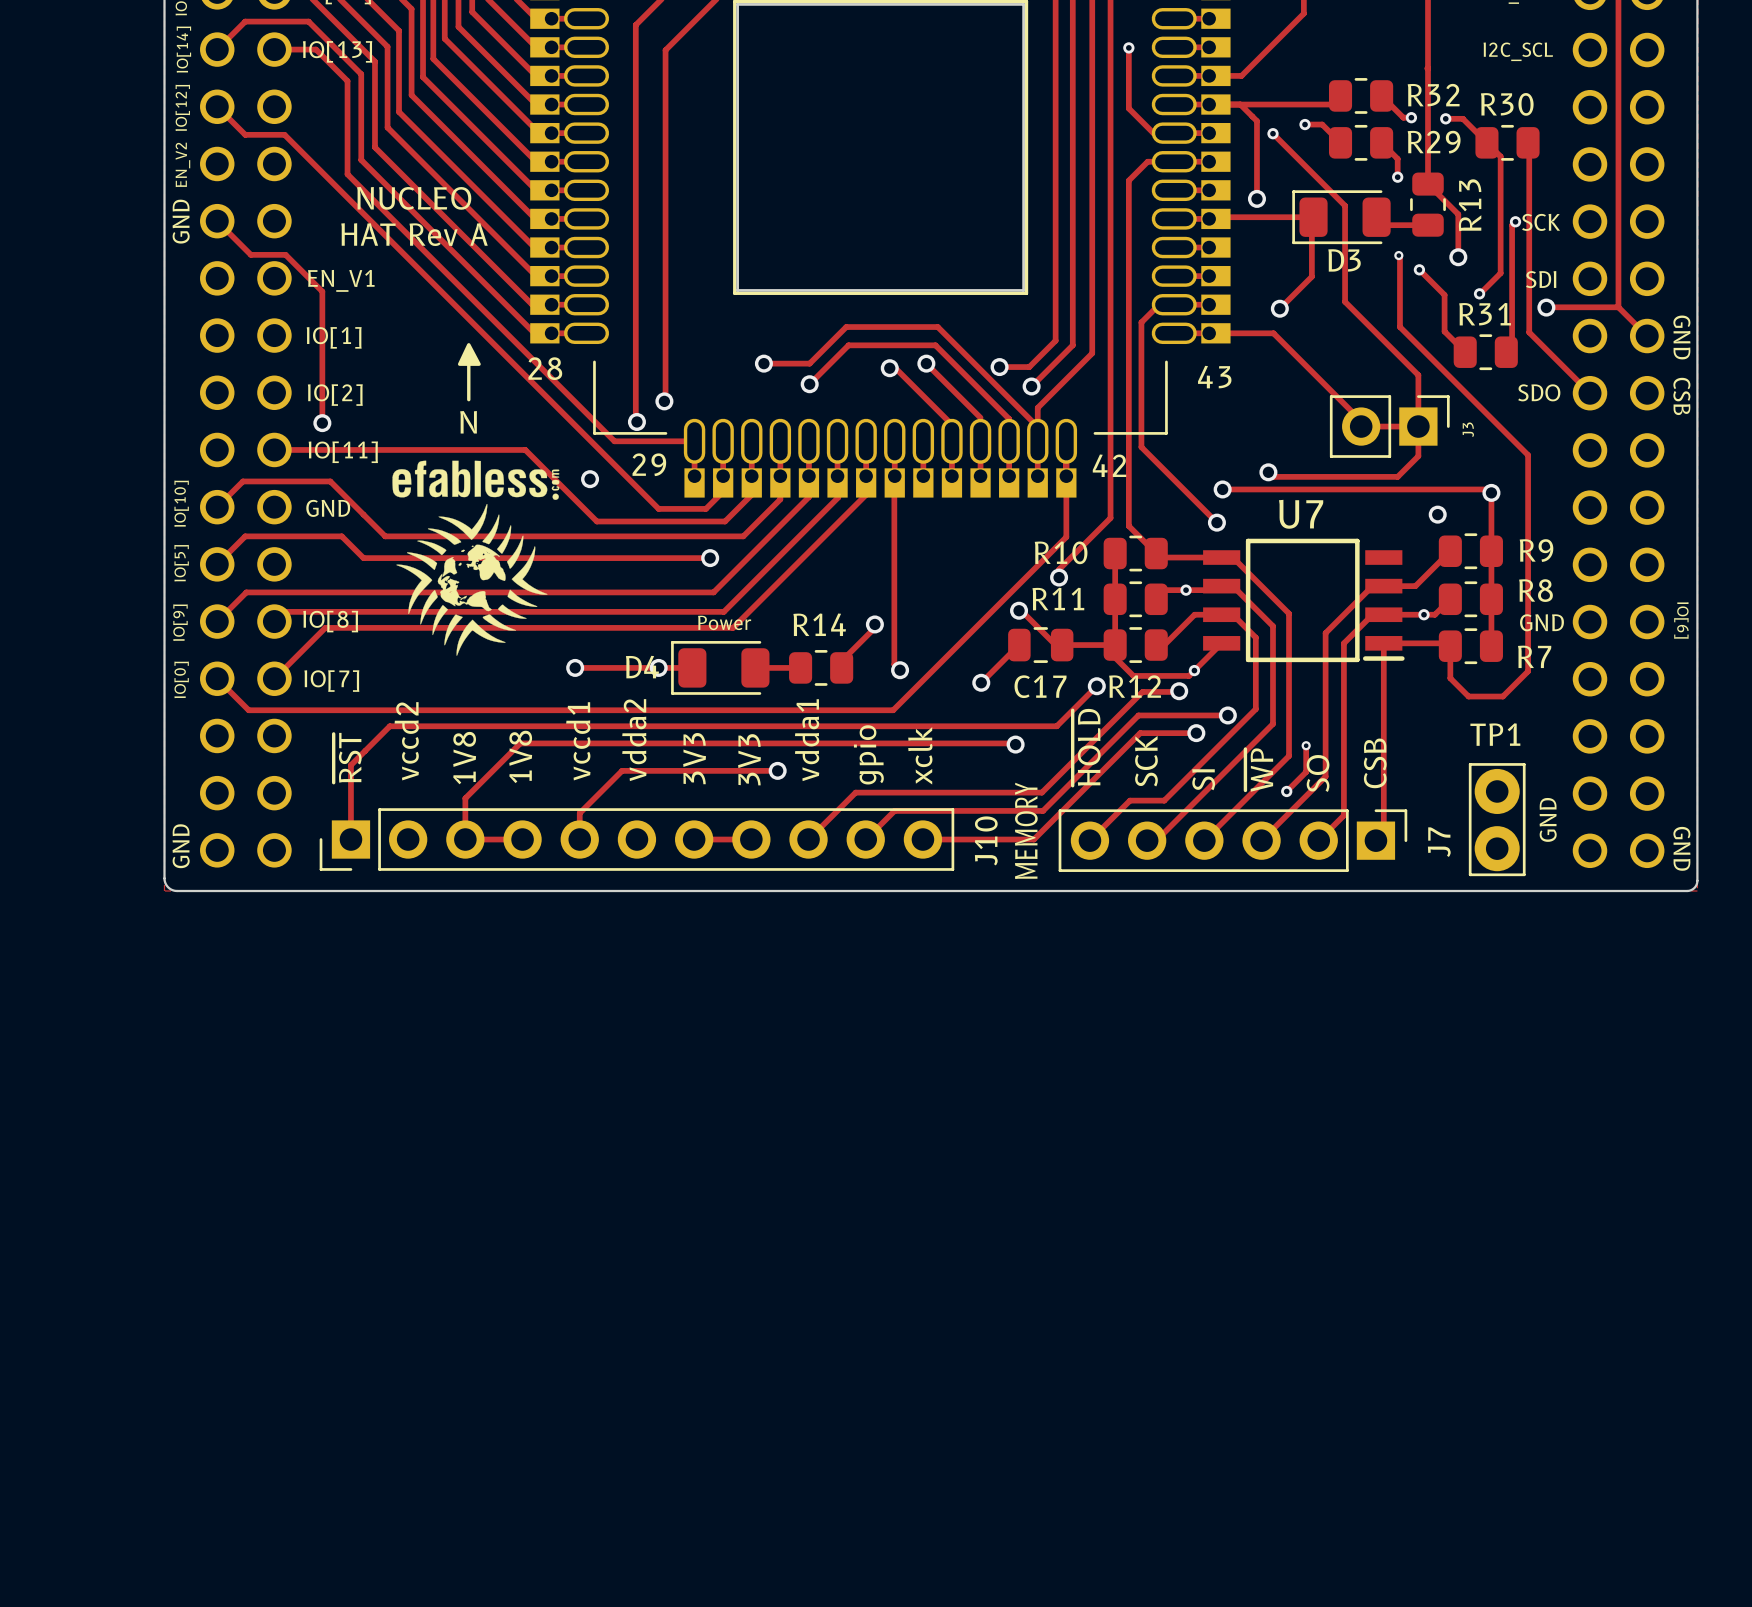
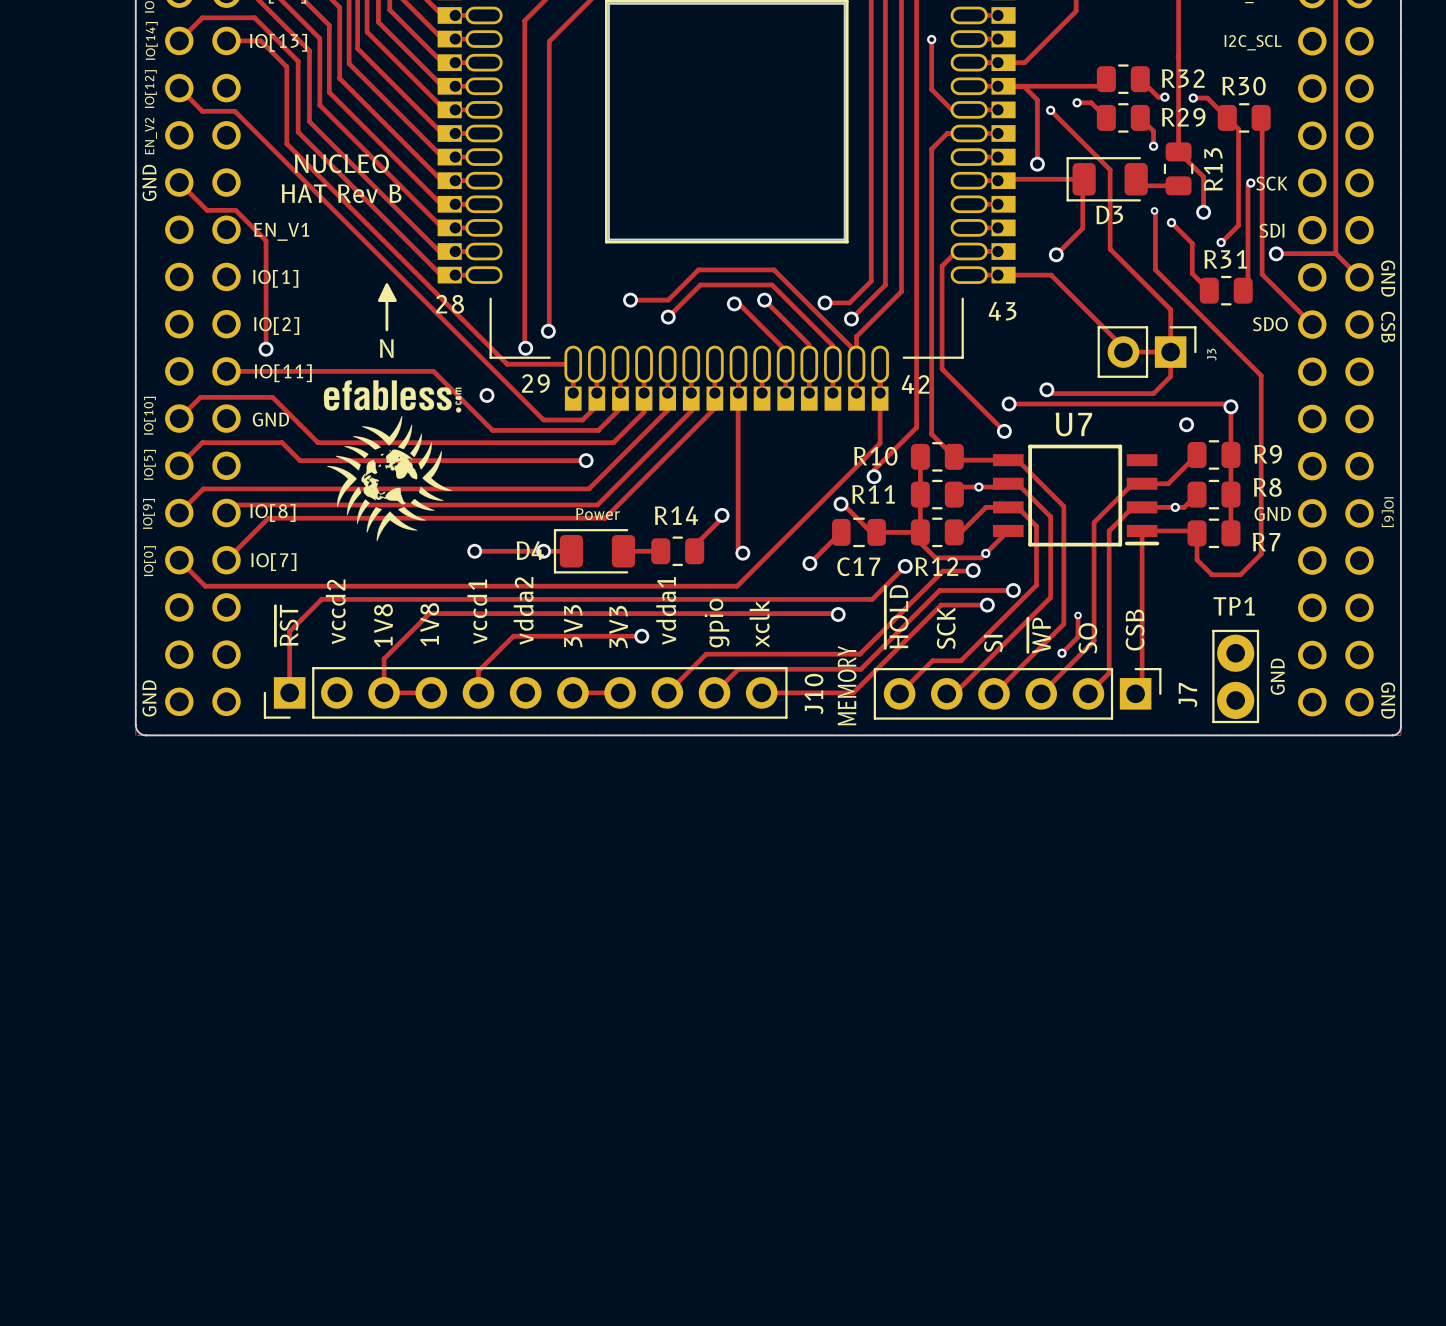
text: HAT Rev A (414, 234) -> HAT Rev B (341, 193)

